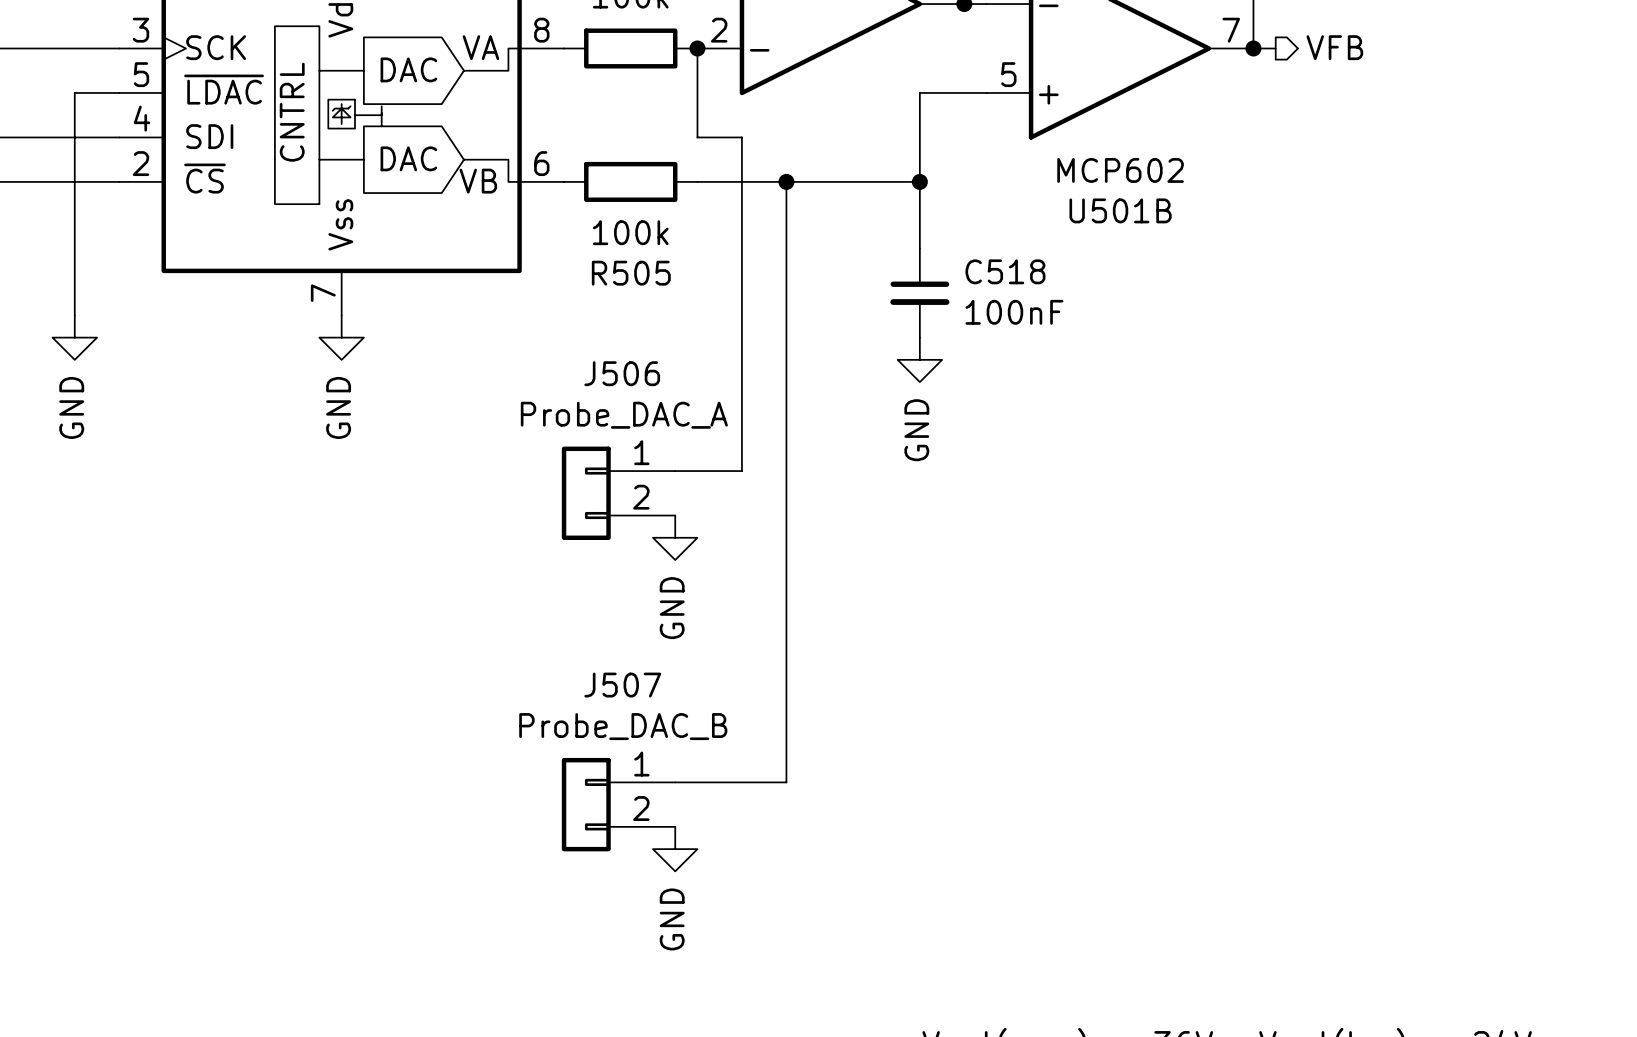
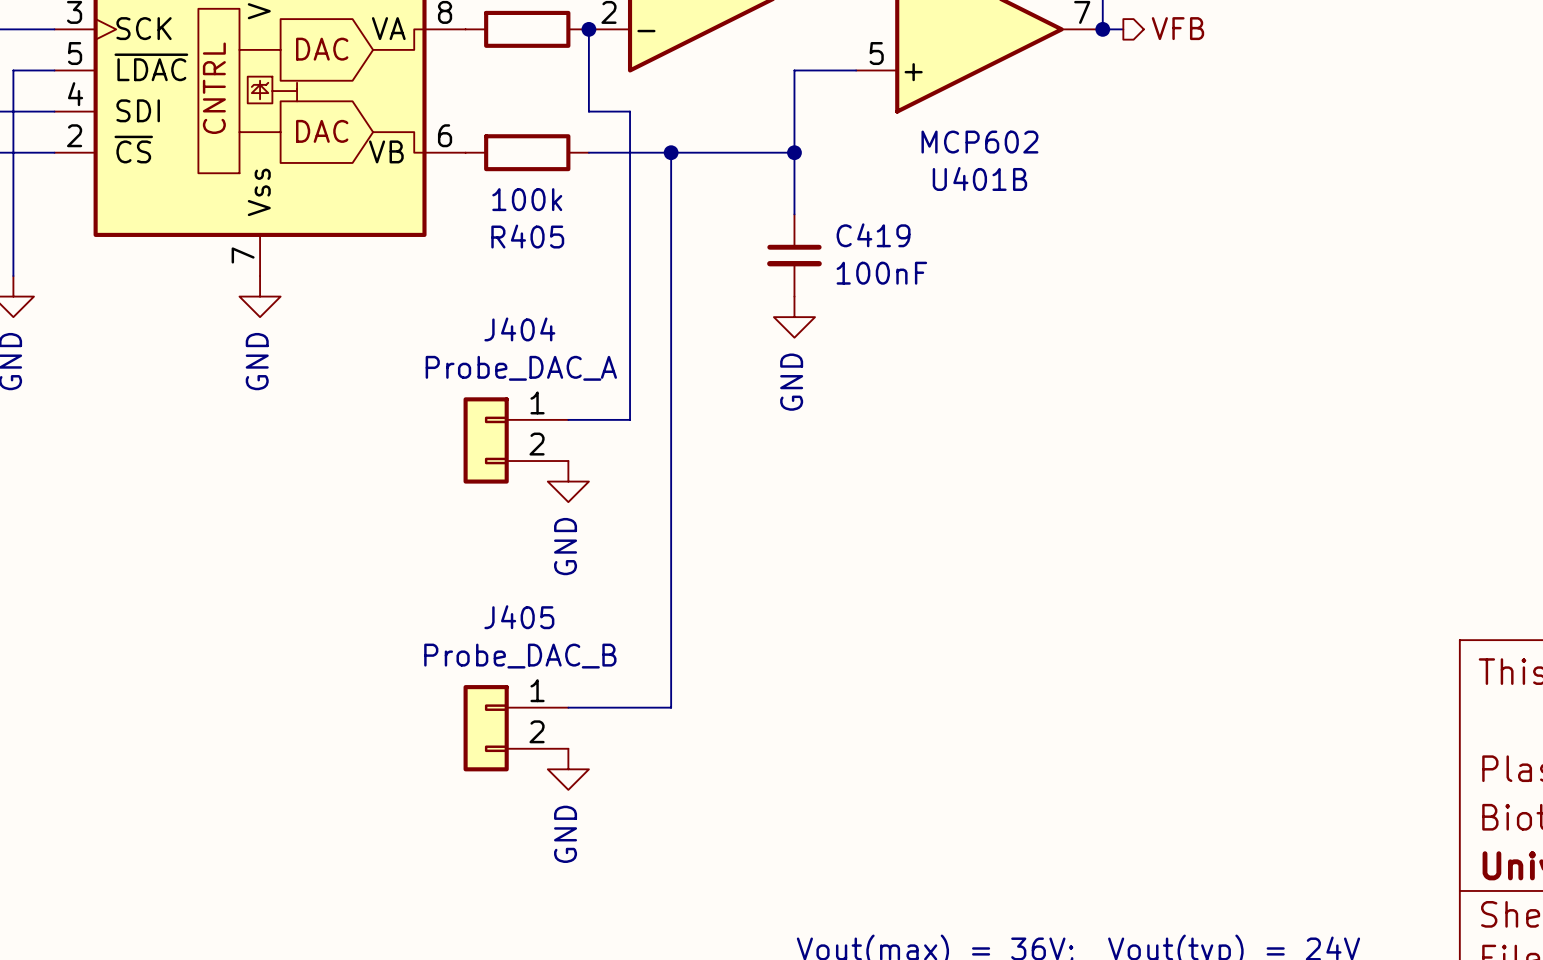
U501B name: U501B (1120, 210) -> U401B (979, 178)
C518 name: C518 (1005, 271) -> C419 (873, 235)
R505 name: R505 (631, 273) -> R405 (527, 236)
J506 name: J506 (622, 373) -> J404 (519, 329)
J507 name: J507 (622, 685) -> J405 (519, 617)

